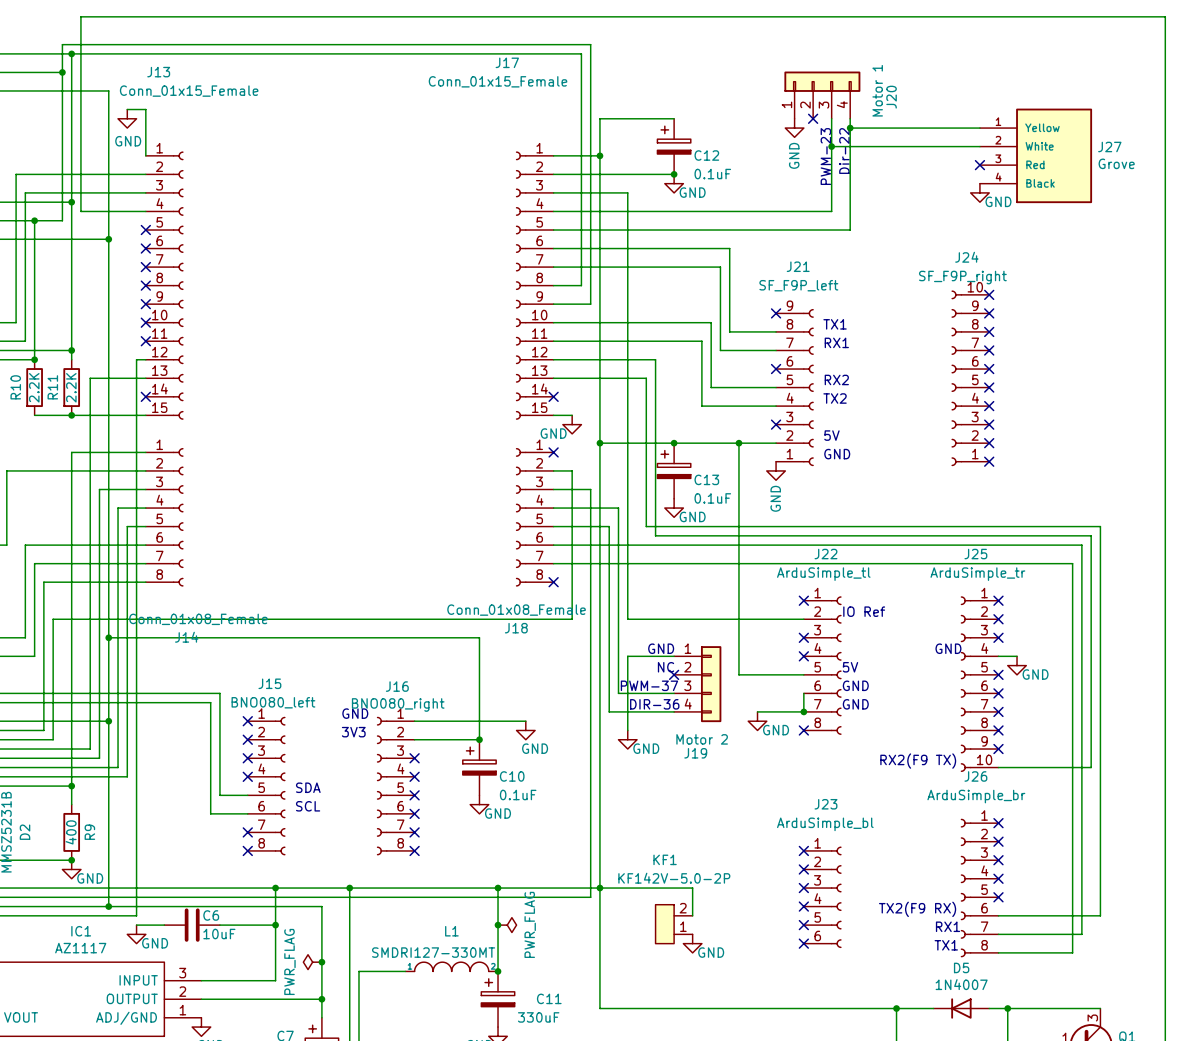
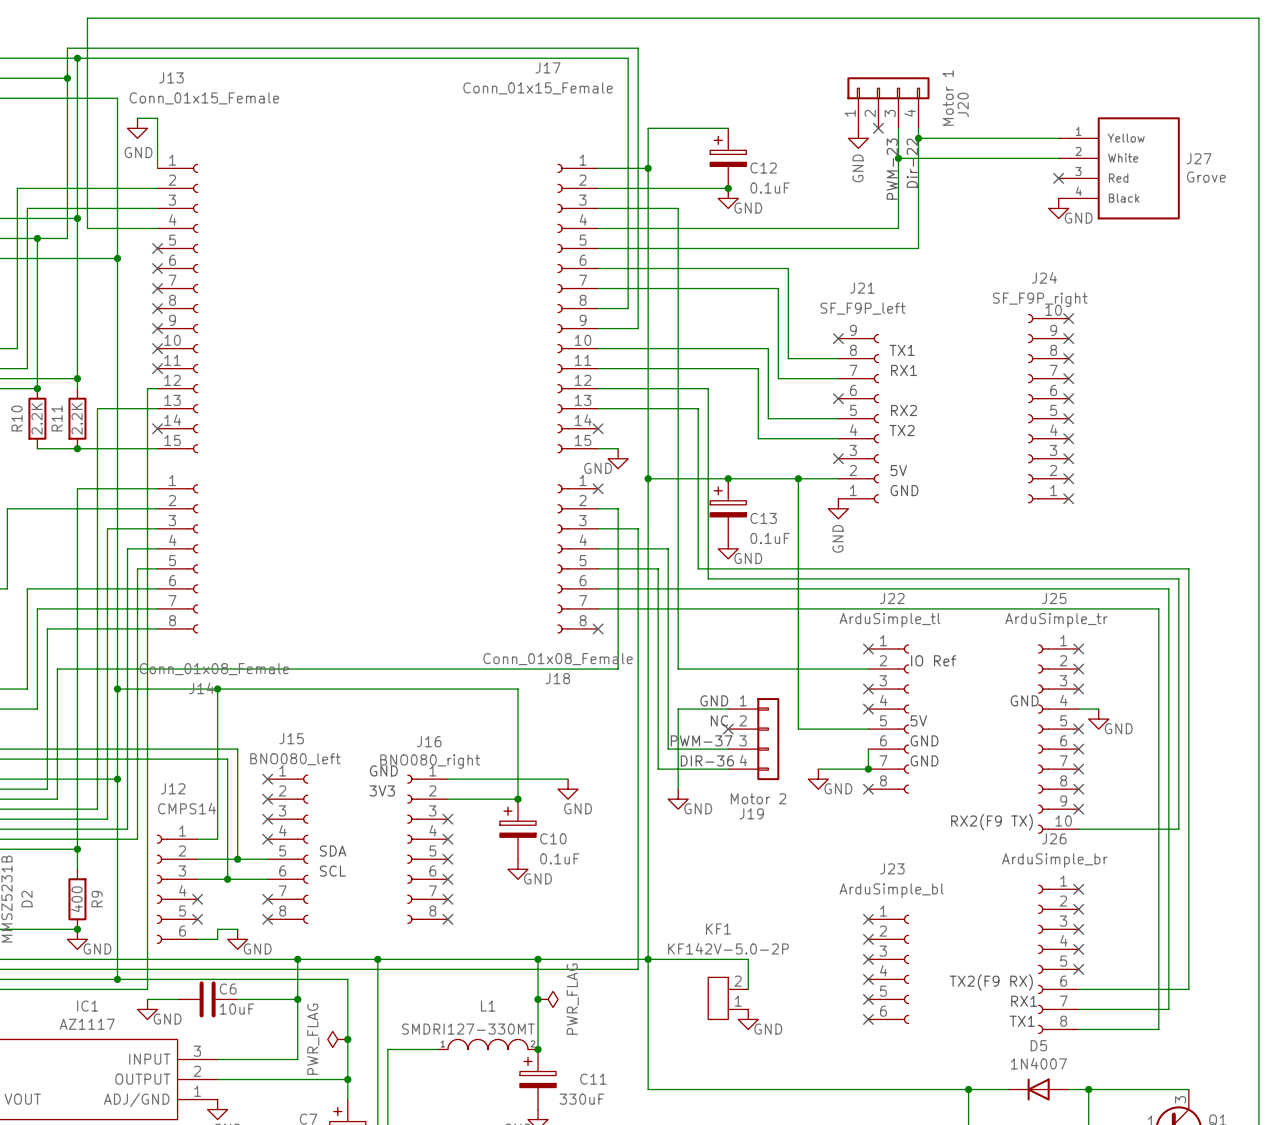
wire: none -> (217, 689) (217, 839) (197, 839)
junction: none -> (217, 689)
wire: none -> (197, 859) (237, 859)
junction: none -> (237, 859)
wire: none -> (197, 879) (227, 879)
junction: none -> (227, 879)
J12: none -> CMPS14 (177, 889)
no-connect mark: none -> (197, 899)
no-connect mark: none -> (197, 919)
wire: none -> (237, 929) (217, 929) (217, 939) (197, 939)
power symbol: none -> GND (237, 939)

